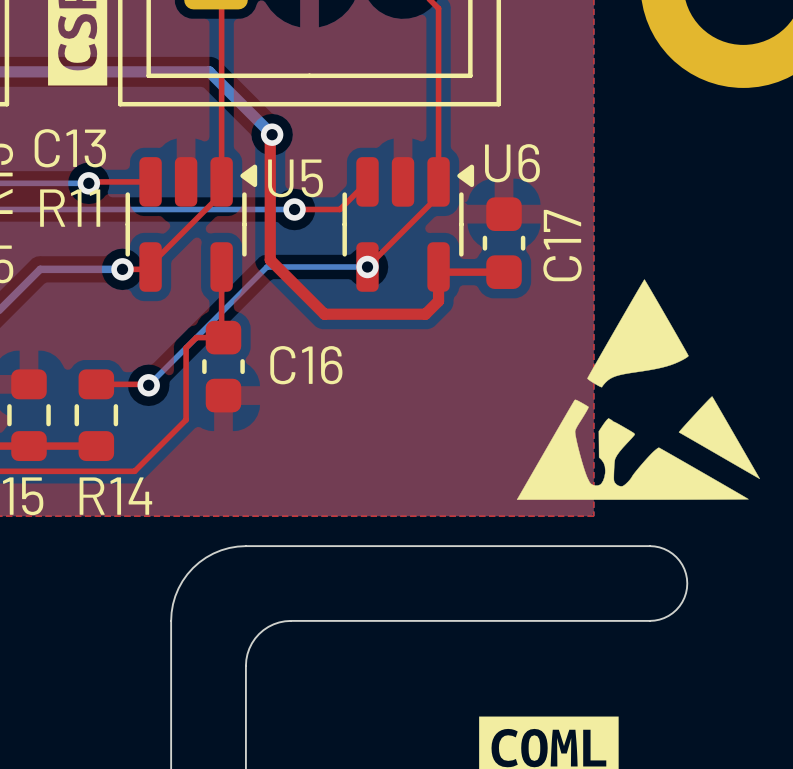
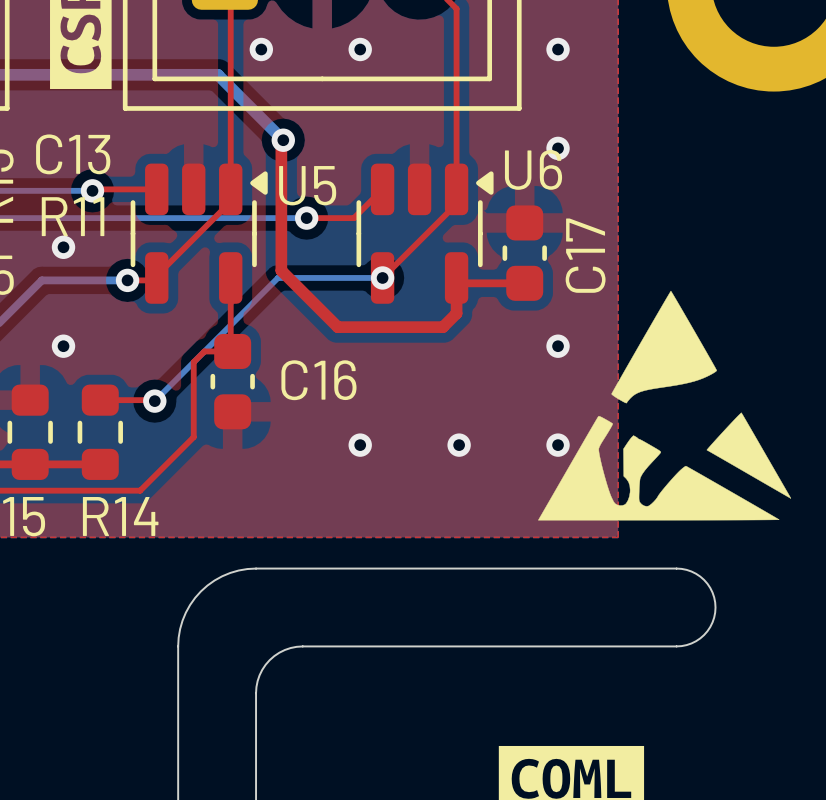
via: none -> (261, 49)
via: none -> (360, 49)
via: none -> (558, 49)
via: none -> (558, 148)
via: none -> (63, 247)
via: none -> (63, 346)
via: none -> (558, 346)
via: none -> (360, 445)
via: none -> (459, 445)
via: none -> (558, 445)

